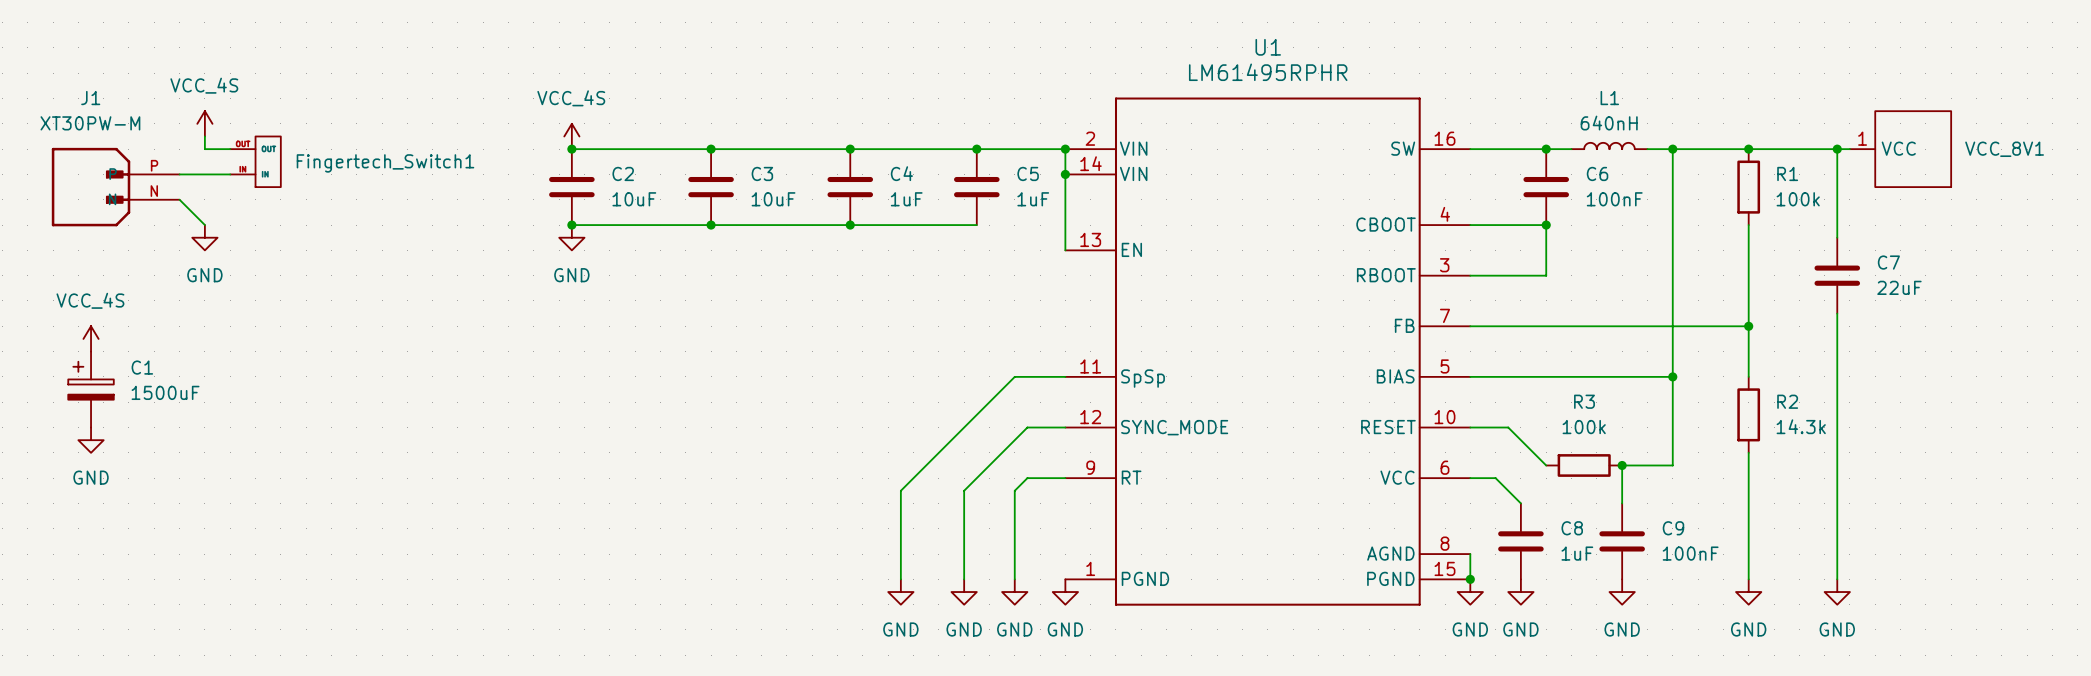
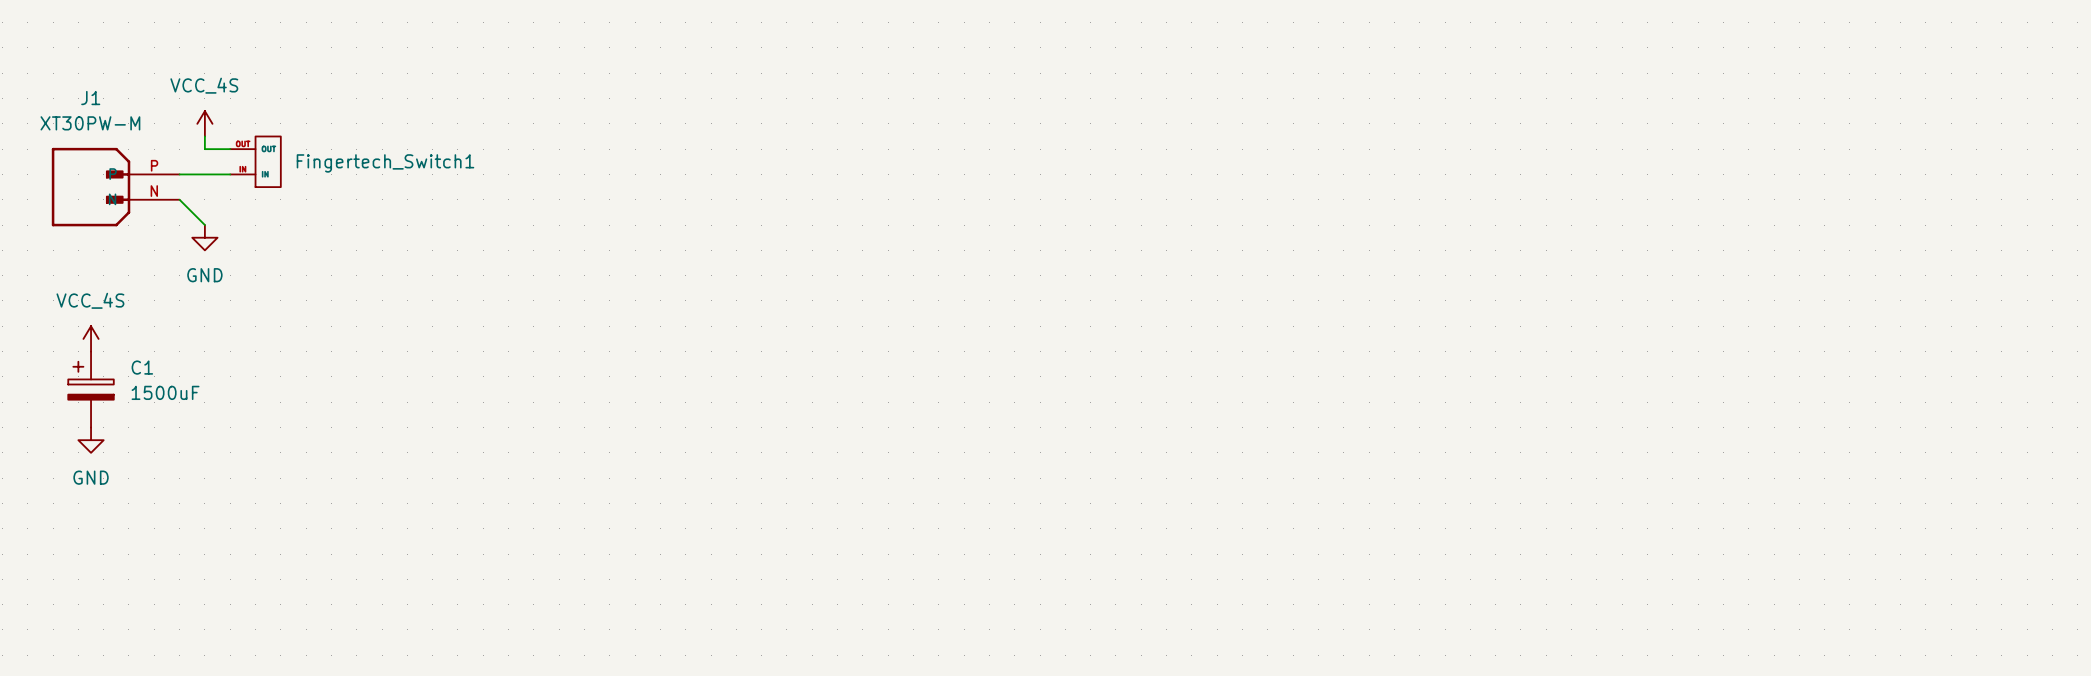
power symbol: VCC_4S (571, 136) -> none
L1: 640nH (1609, 145) -> none
wire: (571, 149) (1065, 149) (1065, 250) -> none
junction: (571, 149) -> none
junction: (711, 149) -> none
junction: (850, 149) -> none
junction: (976, 149) -> none
junction: (1065, 149) -> none
wire: (1470, 149) (1571, 149) -> none
junction: (1546, 149) -> none
wire: (1647, 149) (1849, 149) -> none
wire: (1672, 149) (1672, 465) (1622, 465) (1622, 503) -> none
junction: (1672, 149) -> none
junction: (1748, 149) -> none
wire: (1837, 149) (1837, 237) -> none
junction: (1837, 149) -> none
VCC_8V1: (1900, 149) -> none
junction: (1065, 174) -> none
C2: 10uF (571, 187) -> none
C3: 10uF (711, 187) -> none
C4: 1uF (850, 187) -> none
C5: 1uF (976, 187) -> none
C6: 100nF (1546, 187) -> none
R1: 100k (1748, 187) -> none
wire: (571, 225) (976, 225) -> none
junction: (571, 225) -> none
junction: (711, 225) -> none
junction: (850, 225) -> none
wire: (1470, 225) (1546, 225) (1546, 275) (1470, 275) -> none
junction: (1546, 225) -> none
wire: (1748, 225) (1748, 376) -> none
power symbol: GND (571, 237) -> none
C7: 22uF (1837, 275) -> none
wire: (1837, 313) (1837, 579) -> none
wire: (1470, 326) (1748, 326) -> none
junction: (1748, 326) -> none
U1: LM61495RPHR (1267, 351) -> none
wire: (1065, 376) (1014, 376) (900, 490) (900, 579) -> none
wire: (1470, 376) (1672, 376) -> none
junction: (1672, 376) -> none
R2: 14.3k (1748, 414) -> none
wire: (1065, 427) (1027, 427) (964, 490) (964, 579) -> none
wire: (1470, 427) (1508, 427) (1546, 465) -> none
wire: (1748, 452) (1748, 579) -> none
R3: 100k (1584, 465) -> none
junction: (1622, 465) -> none
wire: (1065, 478) (1027, 478) (1014, 490) (1014, 579) -> none
wire: (1470, 478) (1495, 478) (1520, 503) -> none
C8: 1uF (1520, 541) -> none
C9: 100nF (1622, 541) -> none
wire: (1470, 554) (1470, 579) -> none
junction: (1470, 579) -> none
power symbol: GND (900, 592) -> none
power symbol: GND (964, 592) -> none
power symbol: GND (1014, 592) -> none
power symbol: GND (1065, 592) -> none
power symbol: GND (1470, 592) -> none
power symbol: GND (1520, 592) -> none
power symbol: GND (1622, 592) -> none
power symbol: GND (1748, 592) -> none
power symbol: GND (1837, 592) -> none

